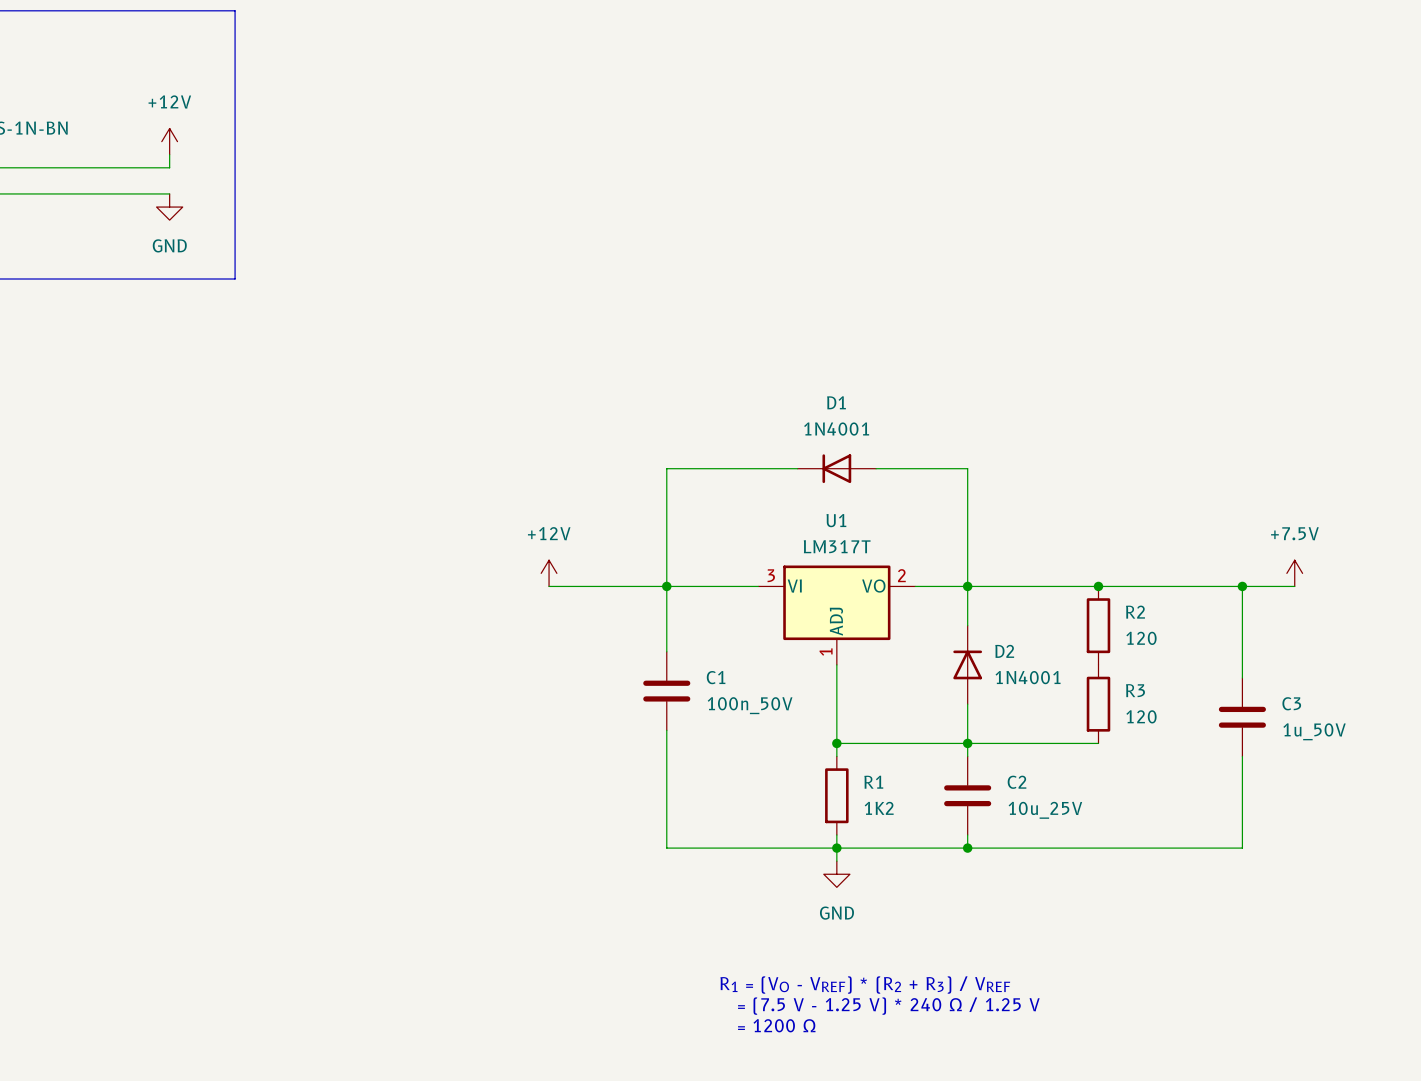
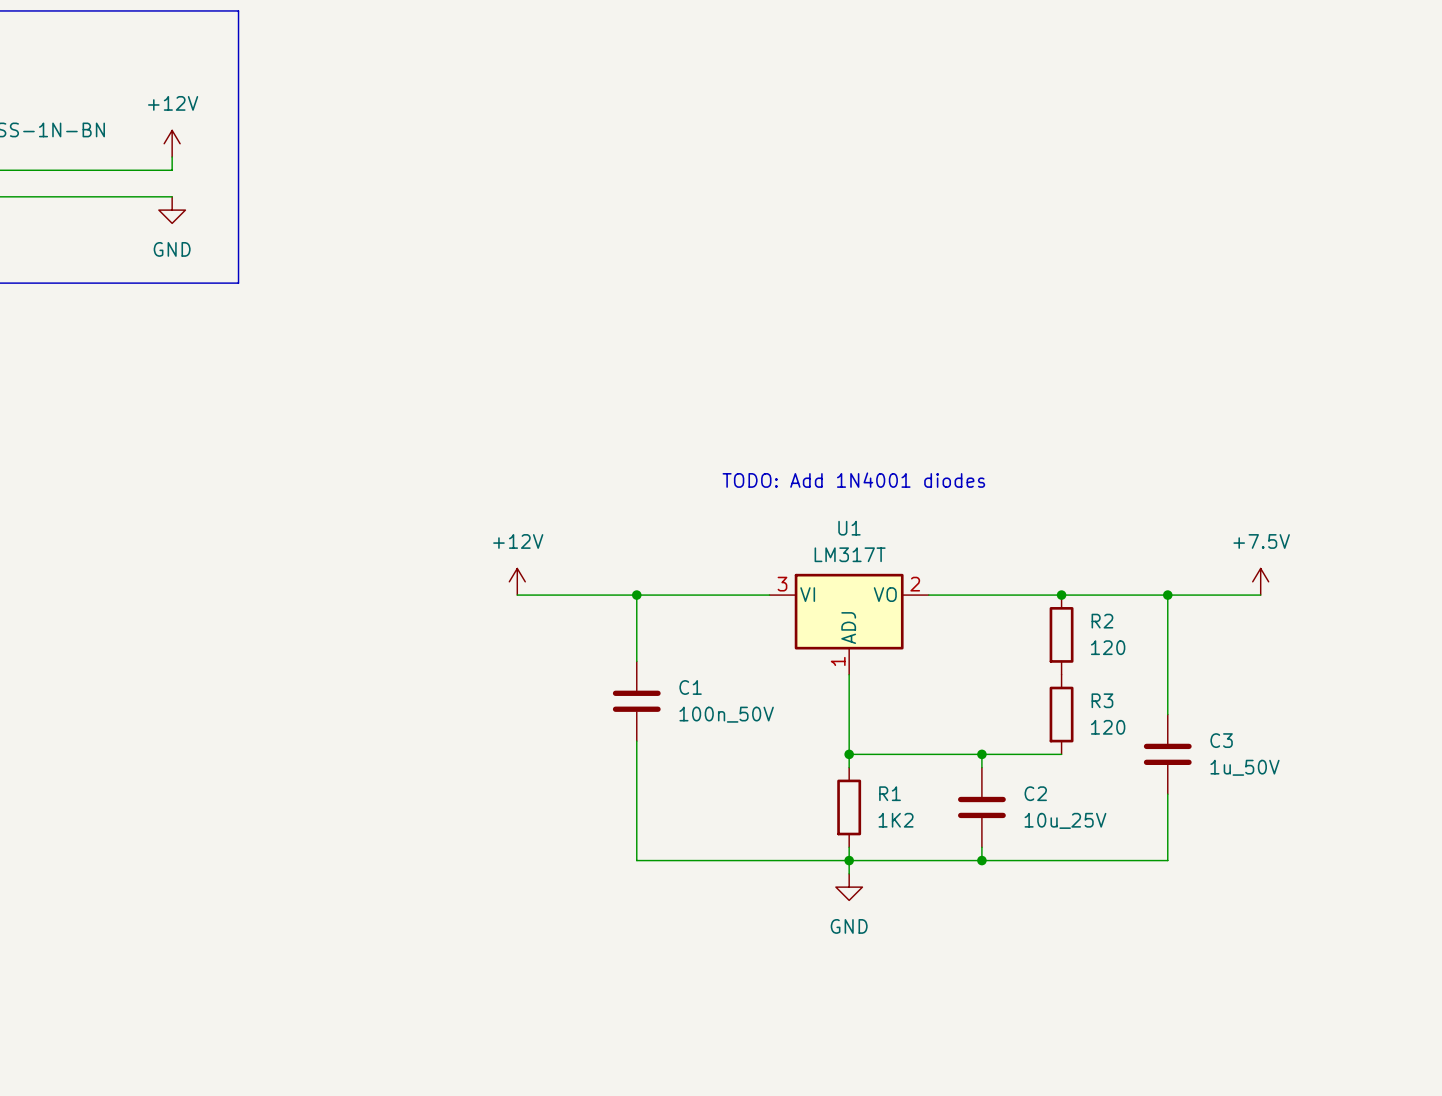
wire: (797, 468) (666, 468) (666, 651) -> none
D1: 1N4001 (836, 468) -> none
wire: (876, 468) (967, 468) (967, 625) -> none
text: none -> TODO: Add 1N4001 diodes (853, 480)
power symbol position: +12V (549, 573) -> +12V (517, 581)
power symbol position: +7.5V (1294, 573) -> +7.5V (1260, 581)
wire: none -> (517, 595) (557, 595)
wire: none -> (636, 595) (636, 661)
junction position: (666, 586) -> (636, 595)
junction: (967, 586) -> none
junction: none -> (1061, 595)
junction: (1098, 586) -> none
wire: none -> (1167, 595) (1167, 714)
junction: none -> (1167, 595)
junction: (1242, 586) -> none
wire: (1294, 586) (1242, 586) (1242, 678) -> none
R2 position: (1098, 625) -> (1061, 634)
D2: 1N4001 (967, 664) -> none
C1 position: (666, 691) -> (636, 701)
wire: (967, 704) (967, 743) -> none
R3 position: (1098, 704) -> (1061, 714)
C3 position: (1242, 717) -> (1167, 754)
wire: (666, 730) (666, 848) -> (636, 741) (636, 860) (676, 860)
wire: (1046, 743) (1098, 743) -> none
wire: (1242, 756) (1242, 848) (1150, 848) -> (1167, 794) (1167, 860)
text: R1 = (VO - VREF) * (R2 + R3) / VREF (865, 985) -> none
text: = (7.5 V - 1.25 V) * 240 Ω / 1.25 V (888, 1006) -> none
text: = 1200 Ω (776, 1025) -> none

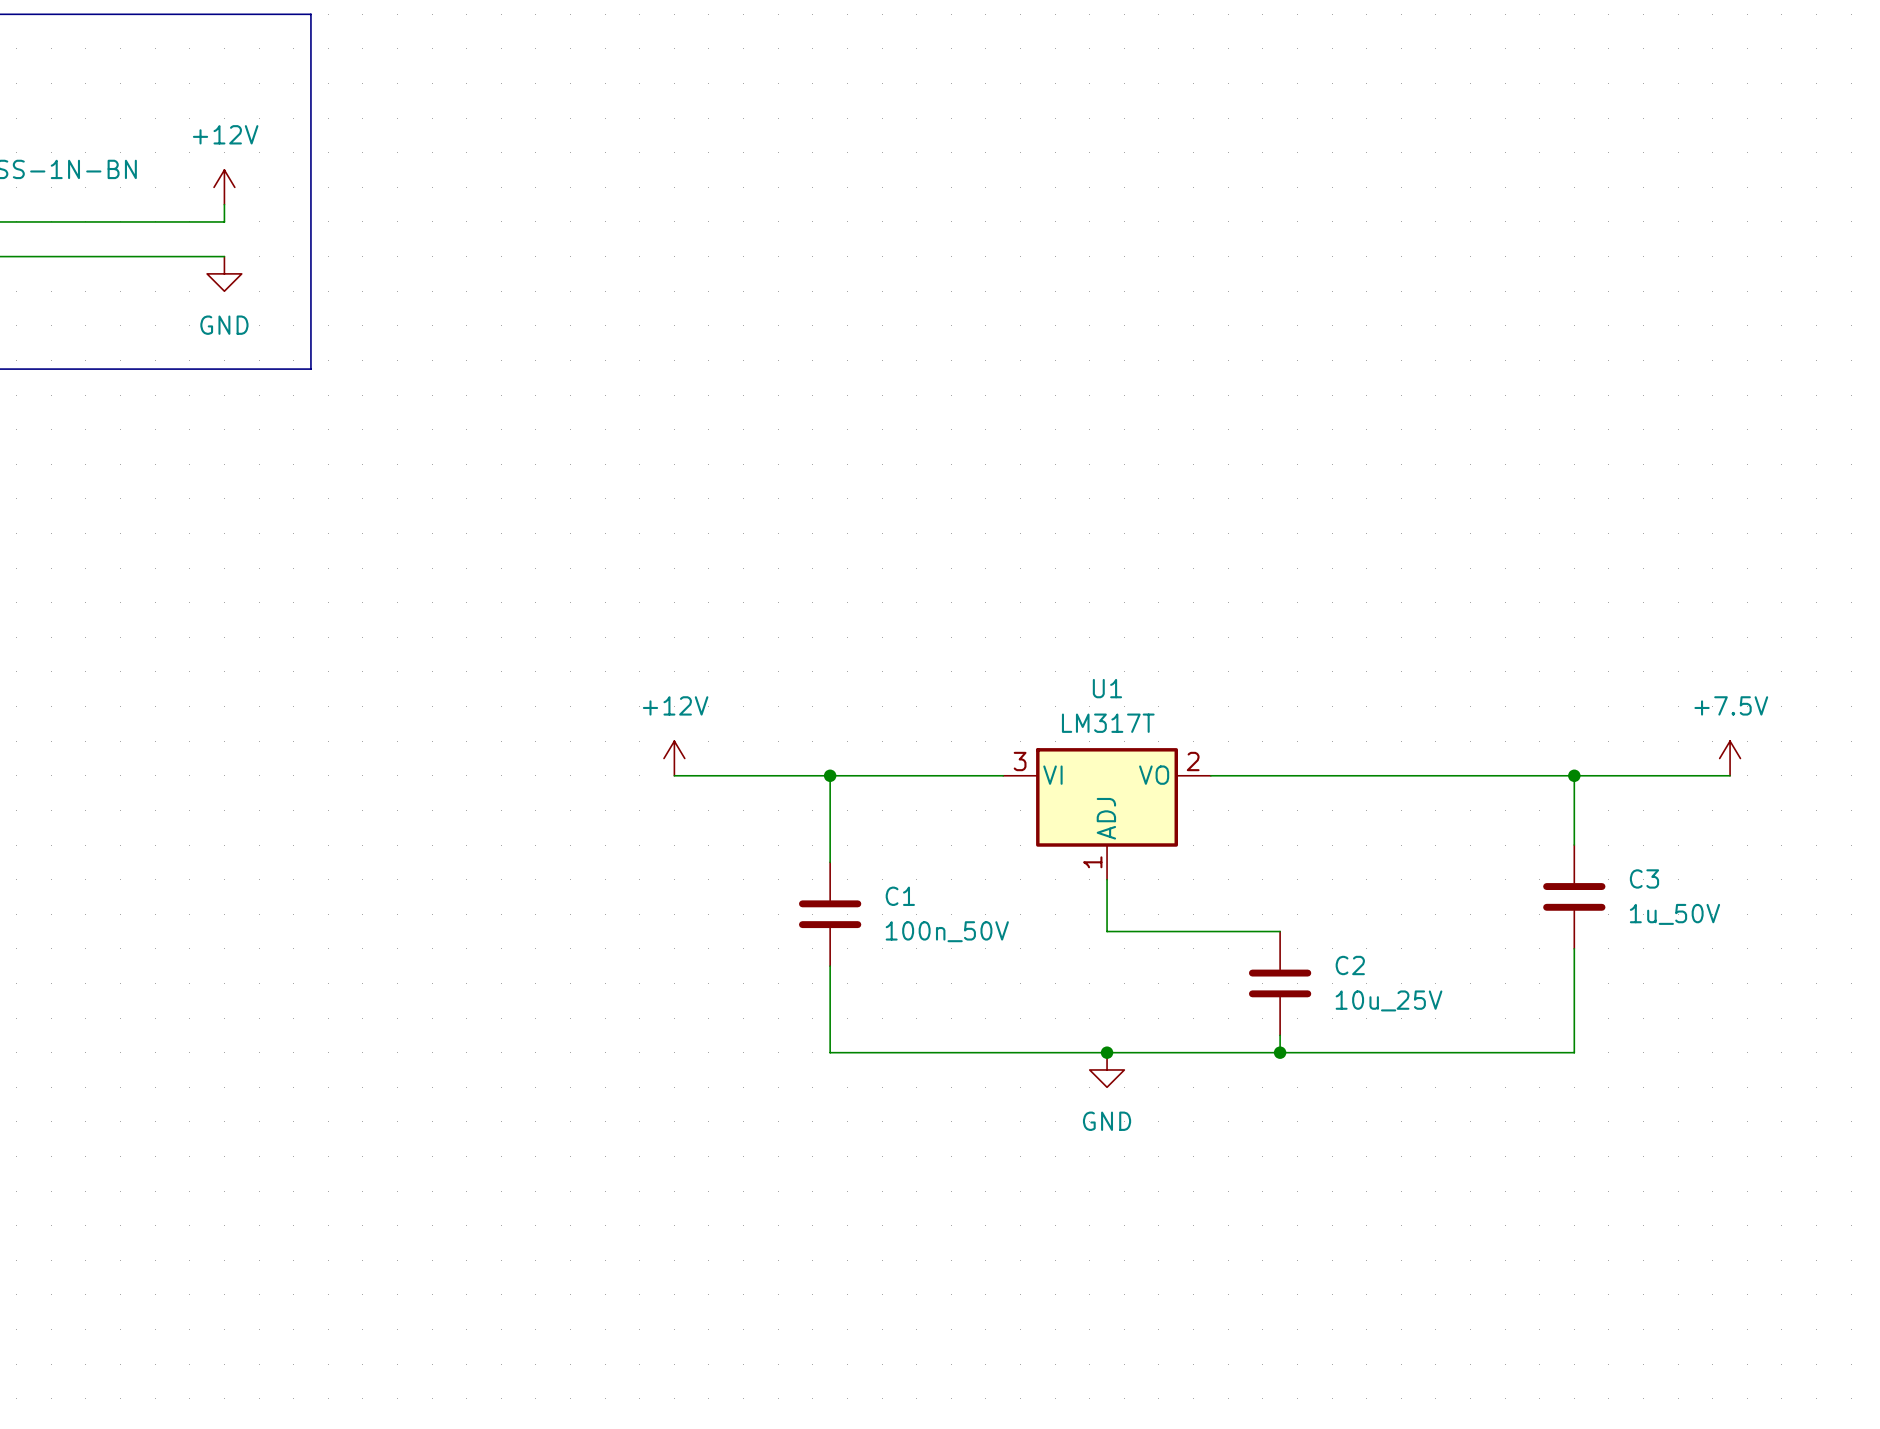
text: TODO: Add 1N4001 diodes (853, 480) -> none
power symbol position: +7.5V (1260, 581) -> +7.5V (1730, 758)
junction: (1061, 595) -> none
wire: (1167, 595) (1167, 714) -> none
junction position: (1167, 595) -> (1574, 775)
wire: none -> (1574, 775) (1574, 845)
wire: none -> (1643, 775) (1730, 775)
R2: 120 (1061, 634) -> none
wire: (849, 714) (849, 767) -> (1107, 931) (1280, 931)
R3: 120 (1061, 714) -> none
wire: (849, 754) (1061, 754) -> none
junction: (849, 754) -> none
junction: (981, 754) -> none
C3 position: (1167, 754) -> (1574, 896)
wire: (1167, 794) (1167, 860) (636, 860) (636, 807) -> (1574, 948) (1574, 1052) (830, 1052)
junction: none -> (1107, 1052)
R1: 1K2 (849, 807) -> none
junction: none -> (1280, 1052)
C2 position: (981, 807) -> (1280, 983)
wire: (849, 847) (849, 873) -> none
wire: (981, 847) (981, 860) -> none
junction: (849, 860) -> none
junction: (981, 860) -> none
power symbol position: GND (849, 887) -> GND (1107, 1069)

